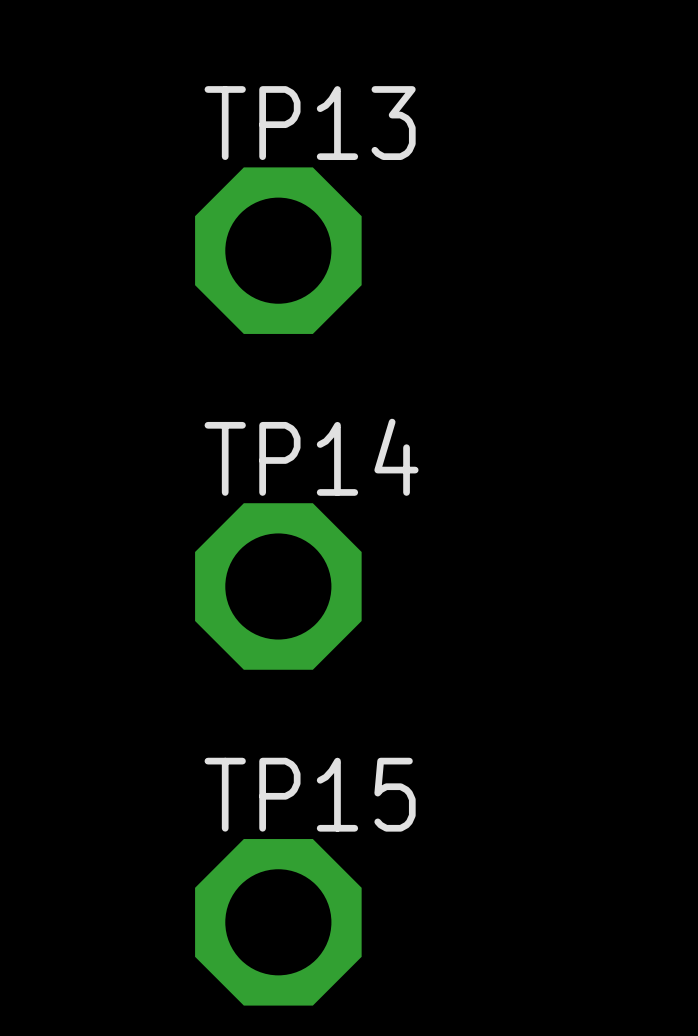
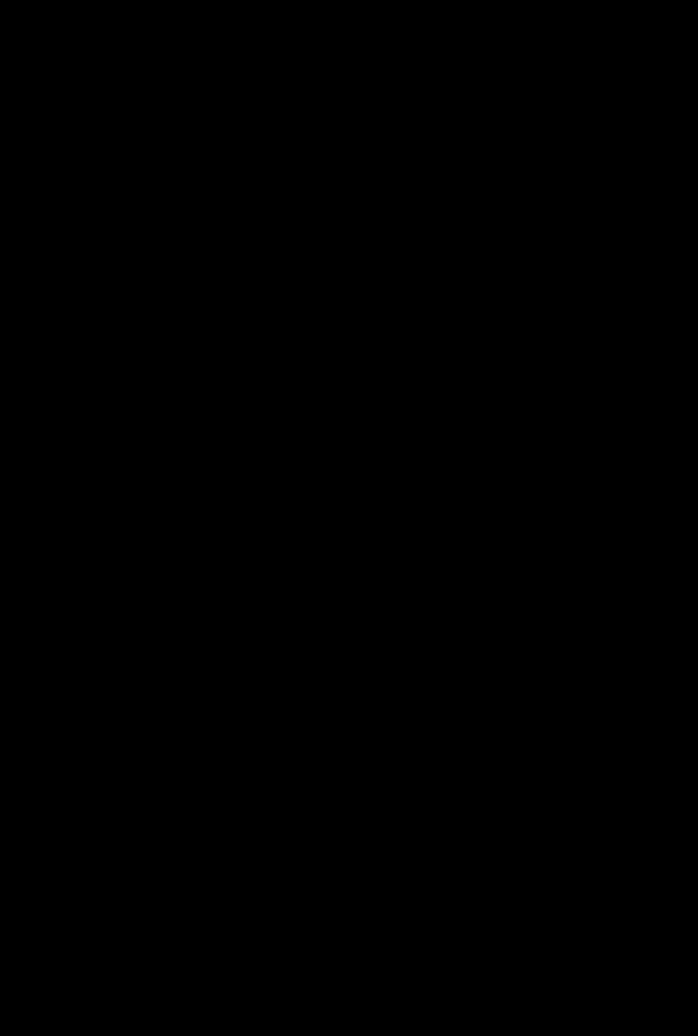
TP13: (278, 250) -> none
TP14: (278, 586) -> none
TP15: (278, 922) -> none

